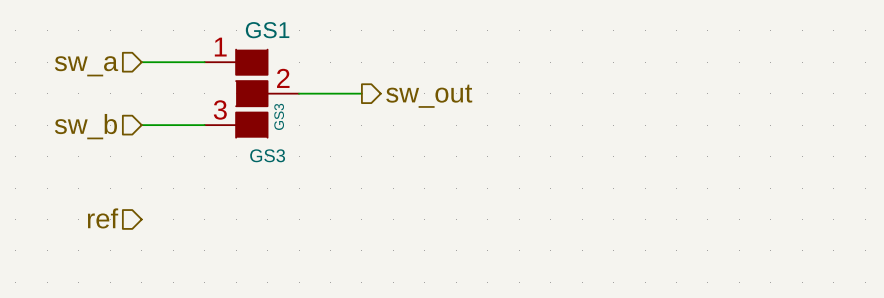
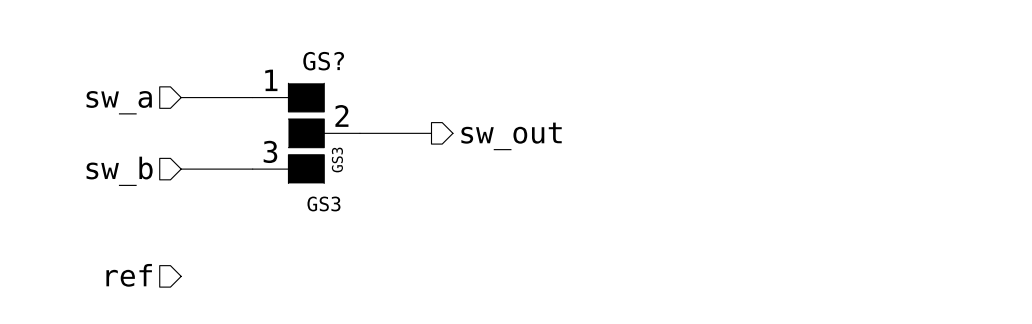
GS1 name: GS1 (267, 30) -> GS? (323, 61)

